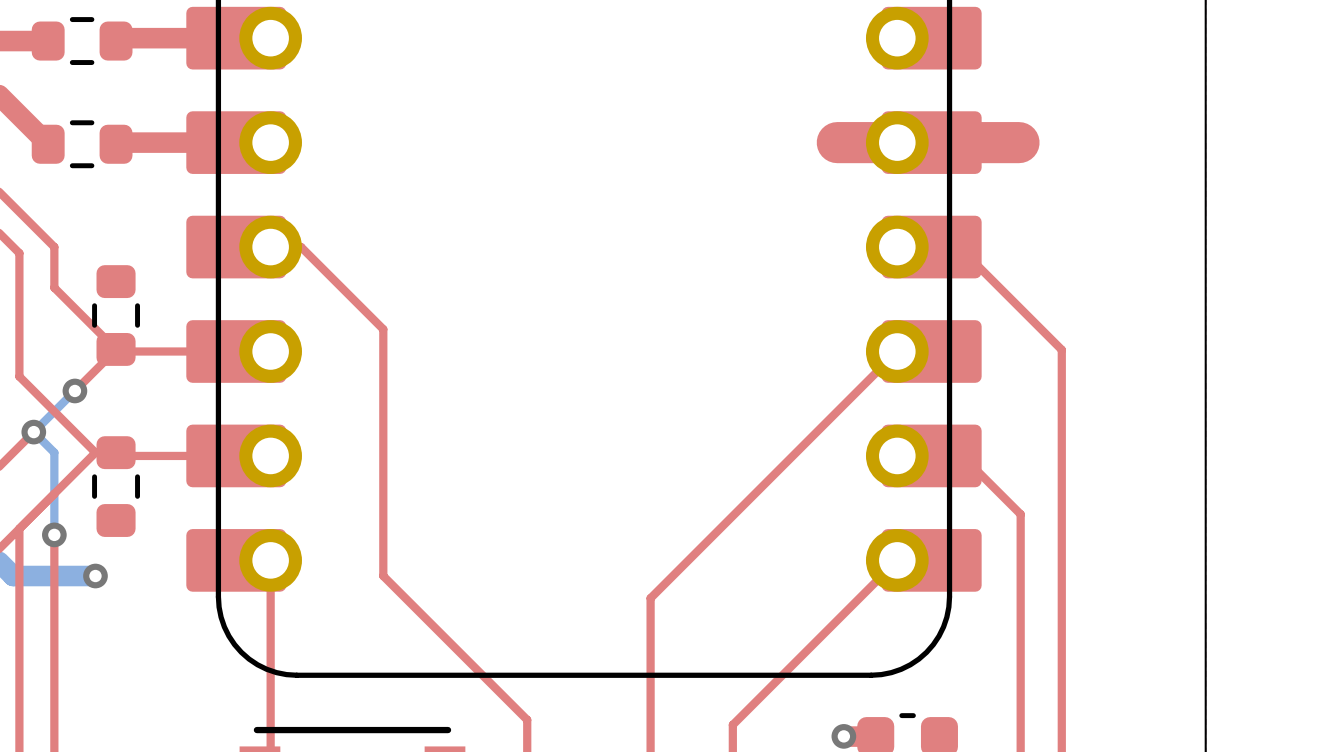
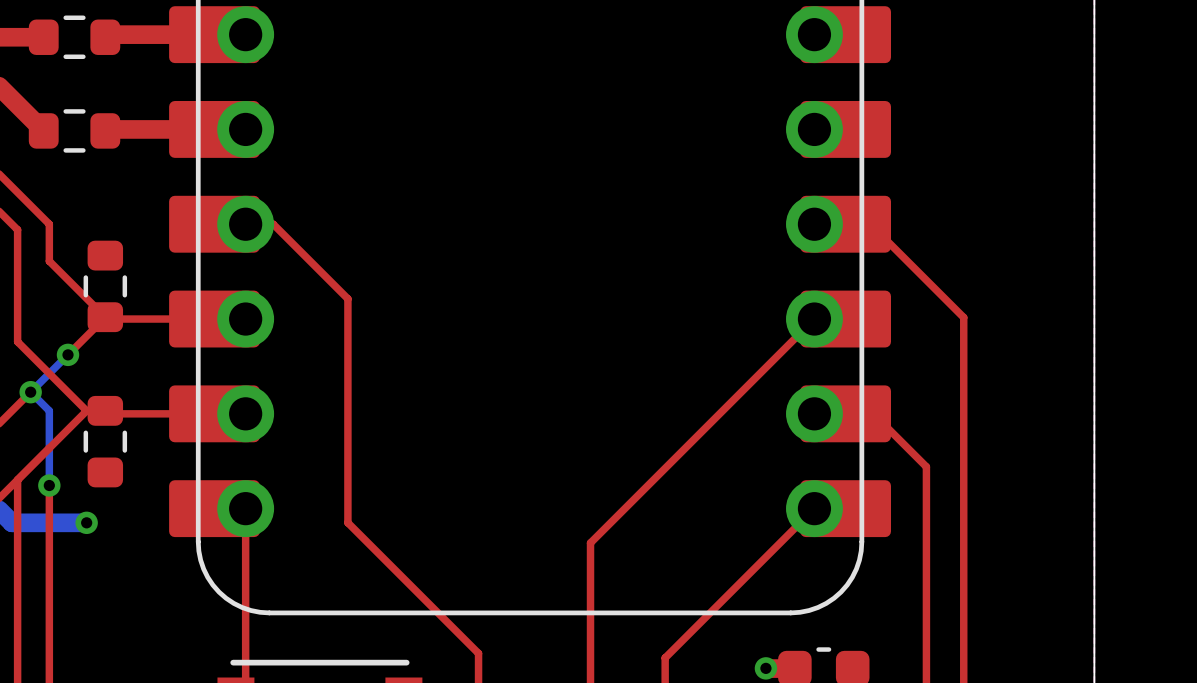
top track: (837, 142) (1019, 142) -> none

